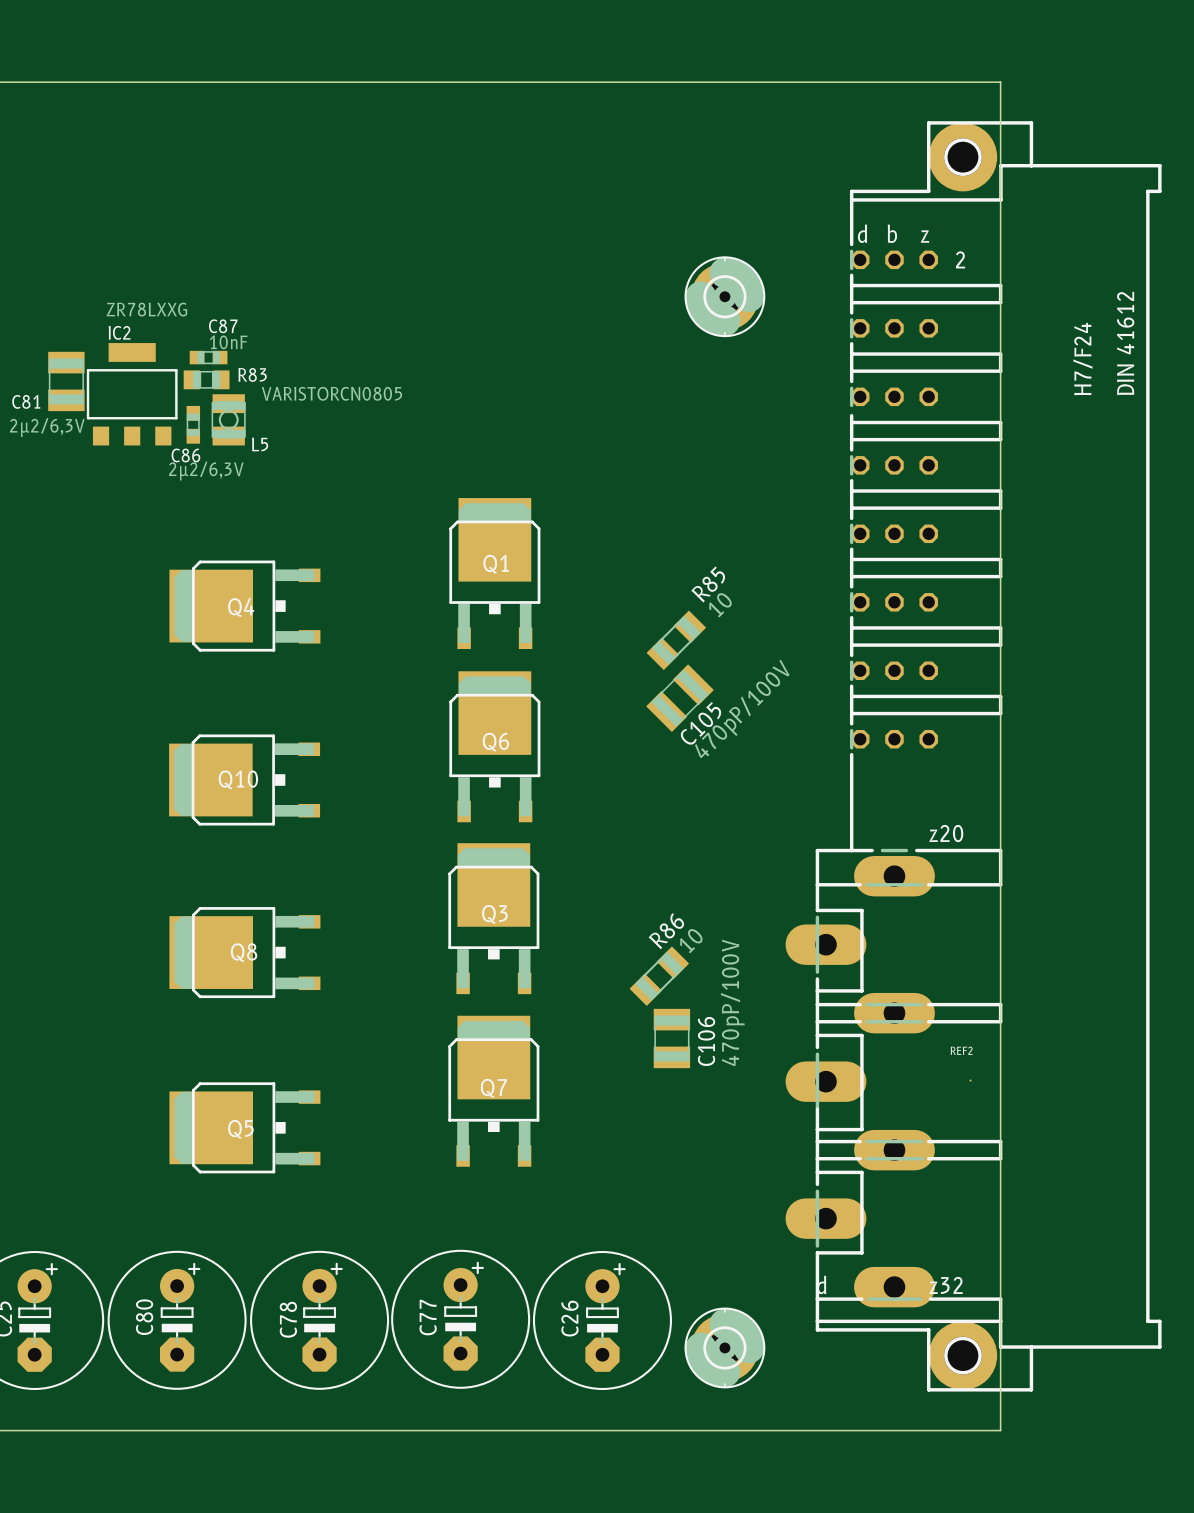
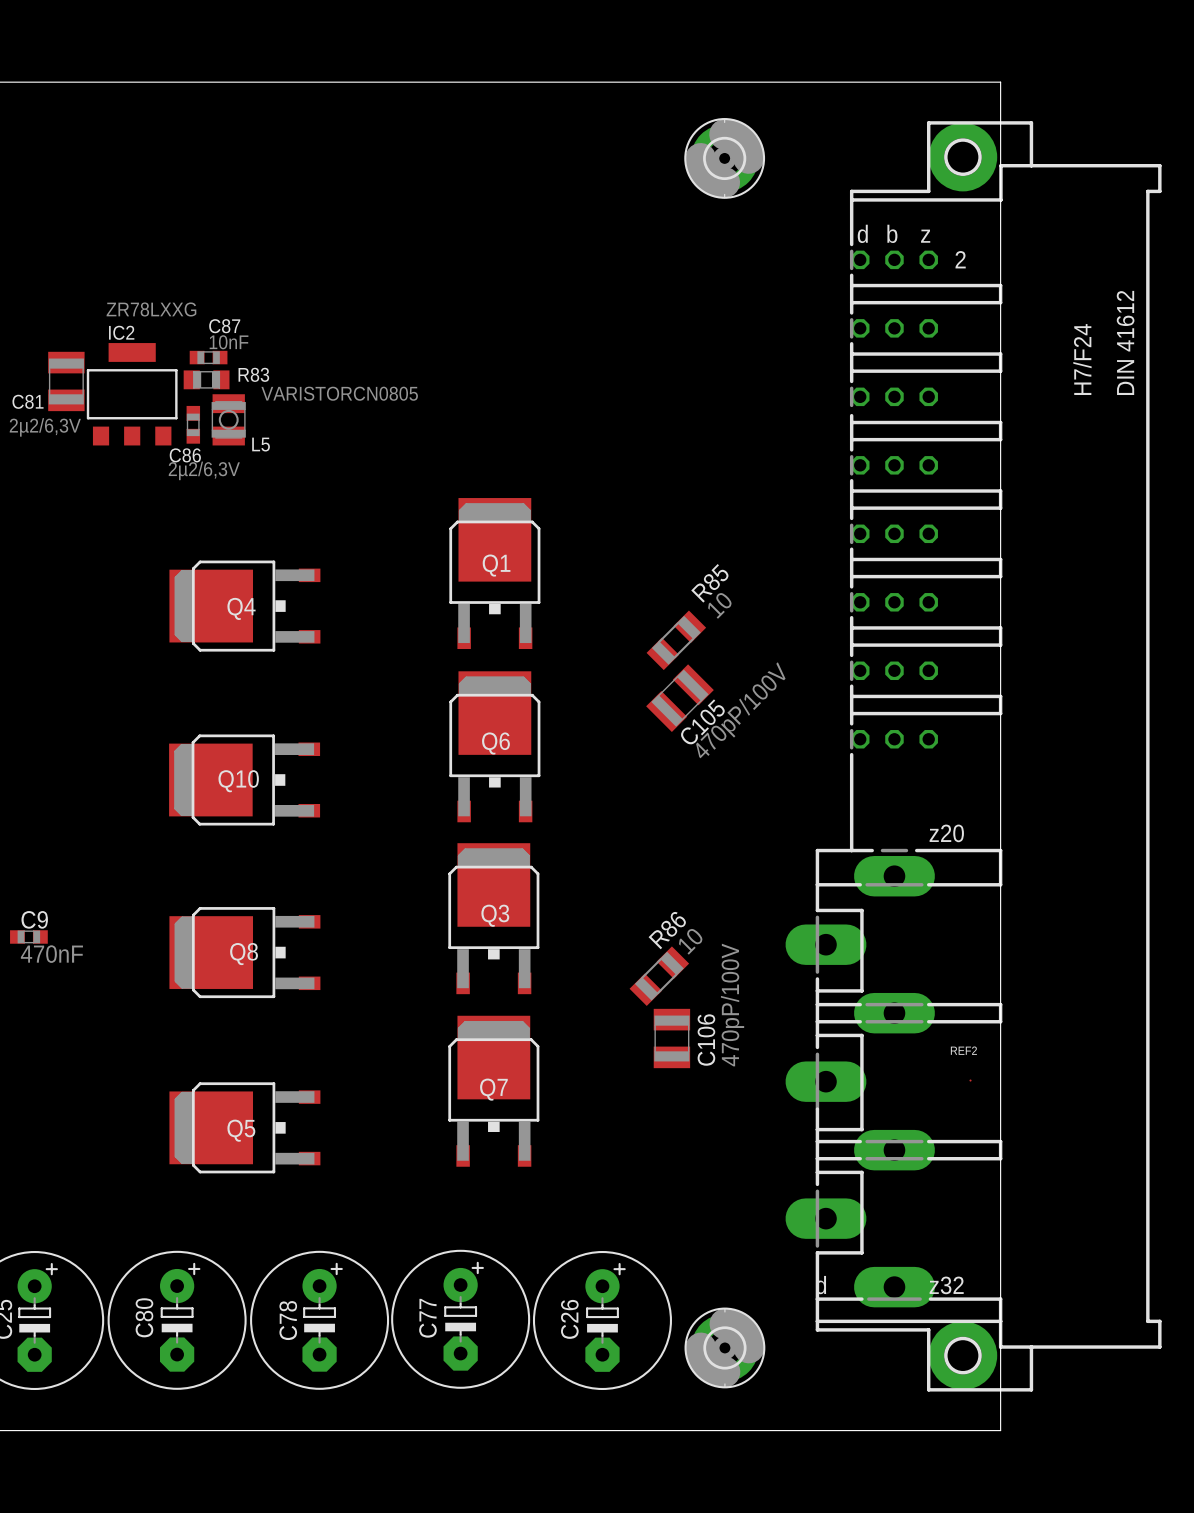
part position: (724, 296) -> (724, 158)
C9: none -> 470nF (28, 936)

